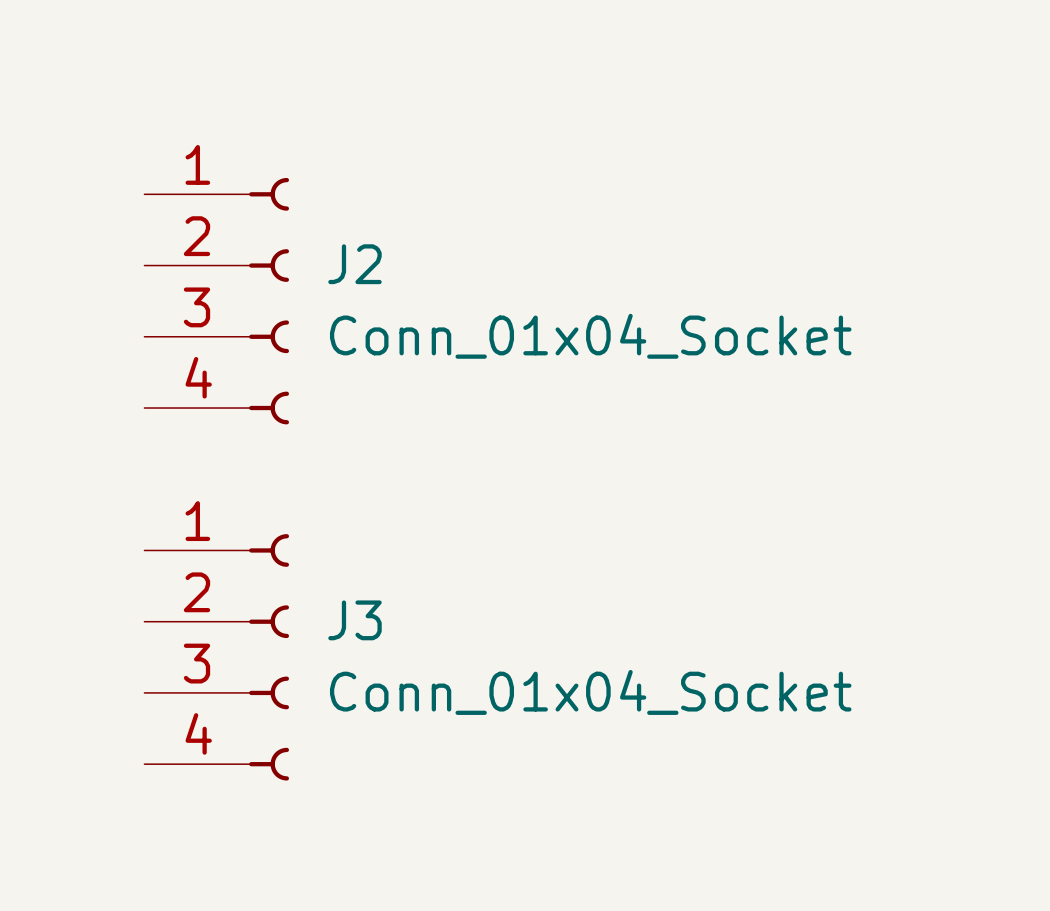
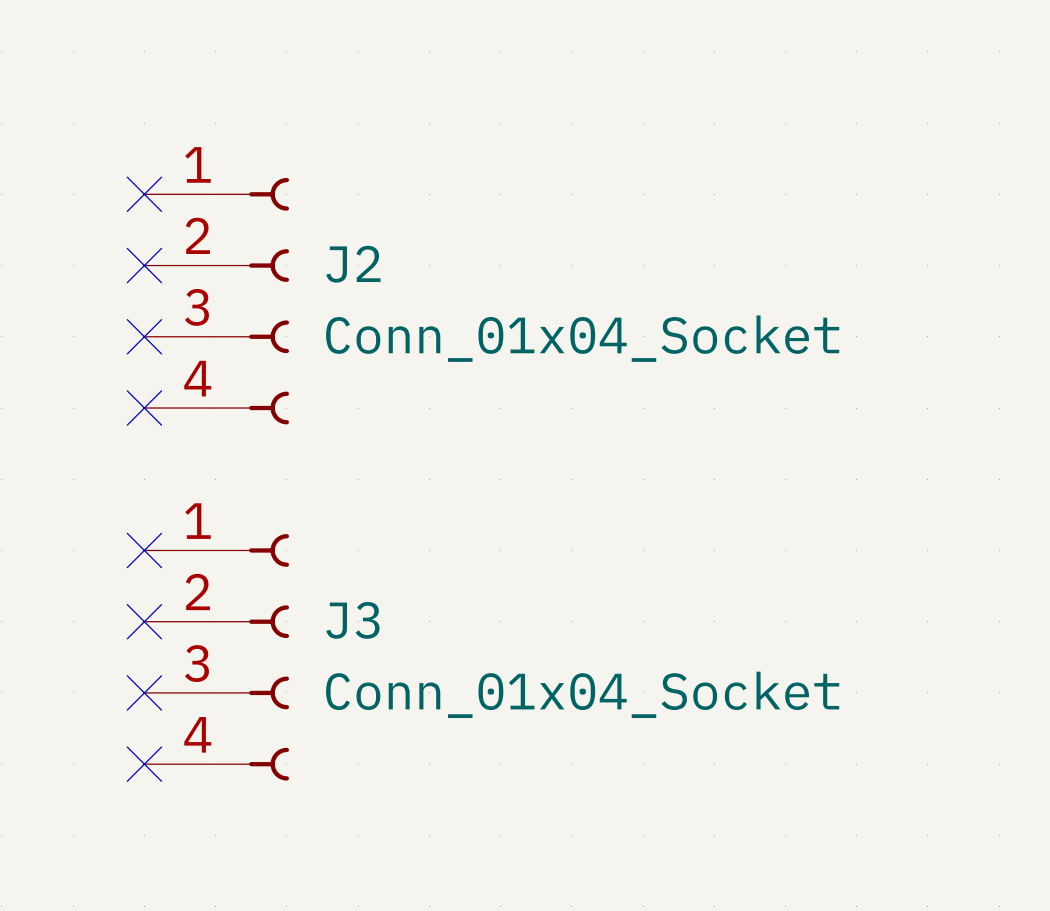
no-connect mark: none -> (144, 194)
no-connect mark: none -> (144, 265)
no-connect mark: none -> (144, 336)
no-connect mark: none -> (144, 408)
no-connect mark: none -> (144, 550)
no-connect mark: none -> (144, 621)
no-connect mark: none -> (144, 692)
no-connect mark: none -> (144, 764)

